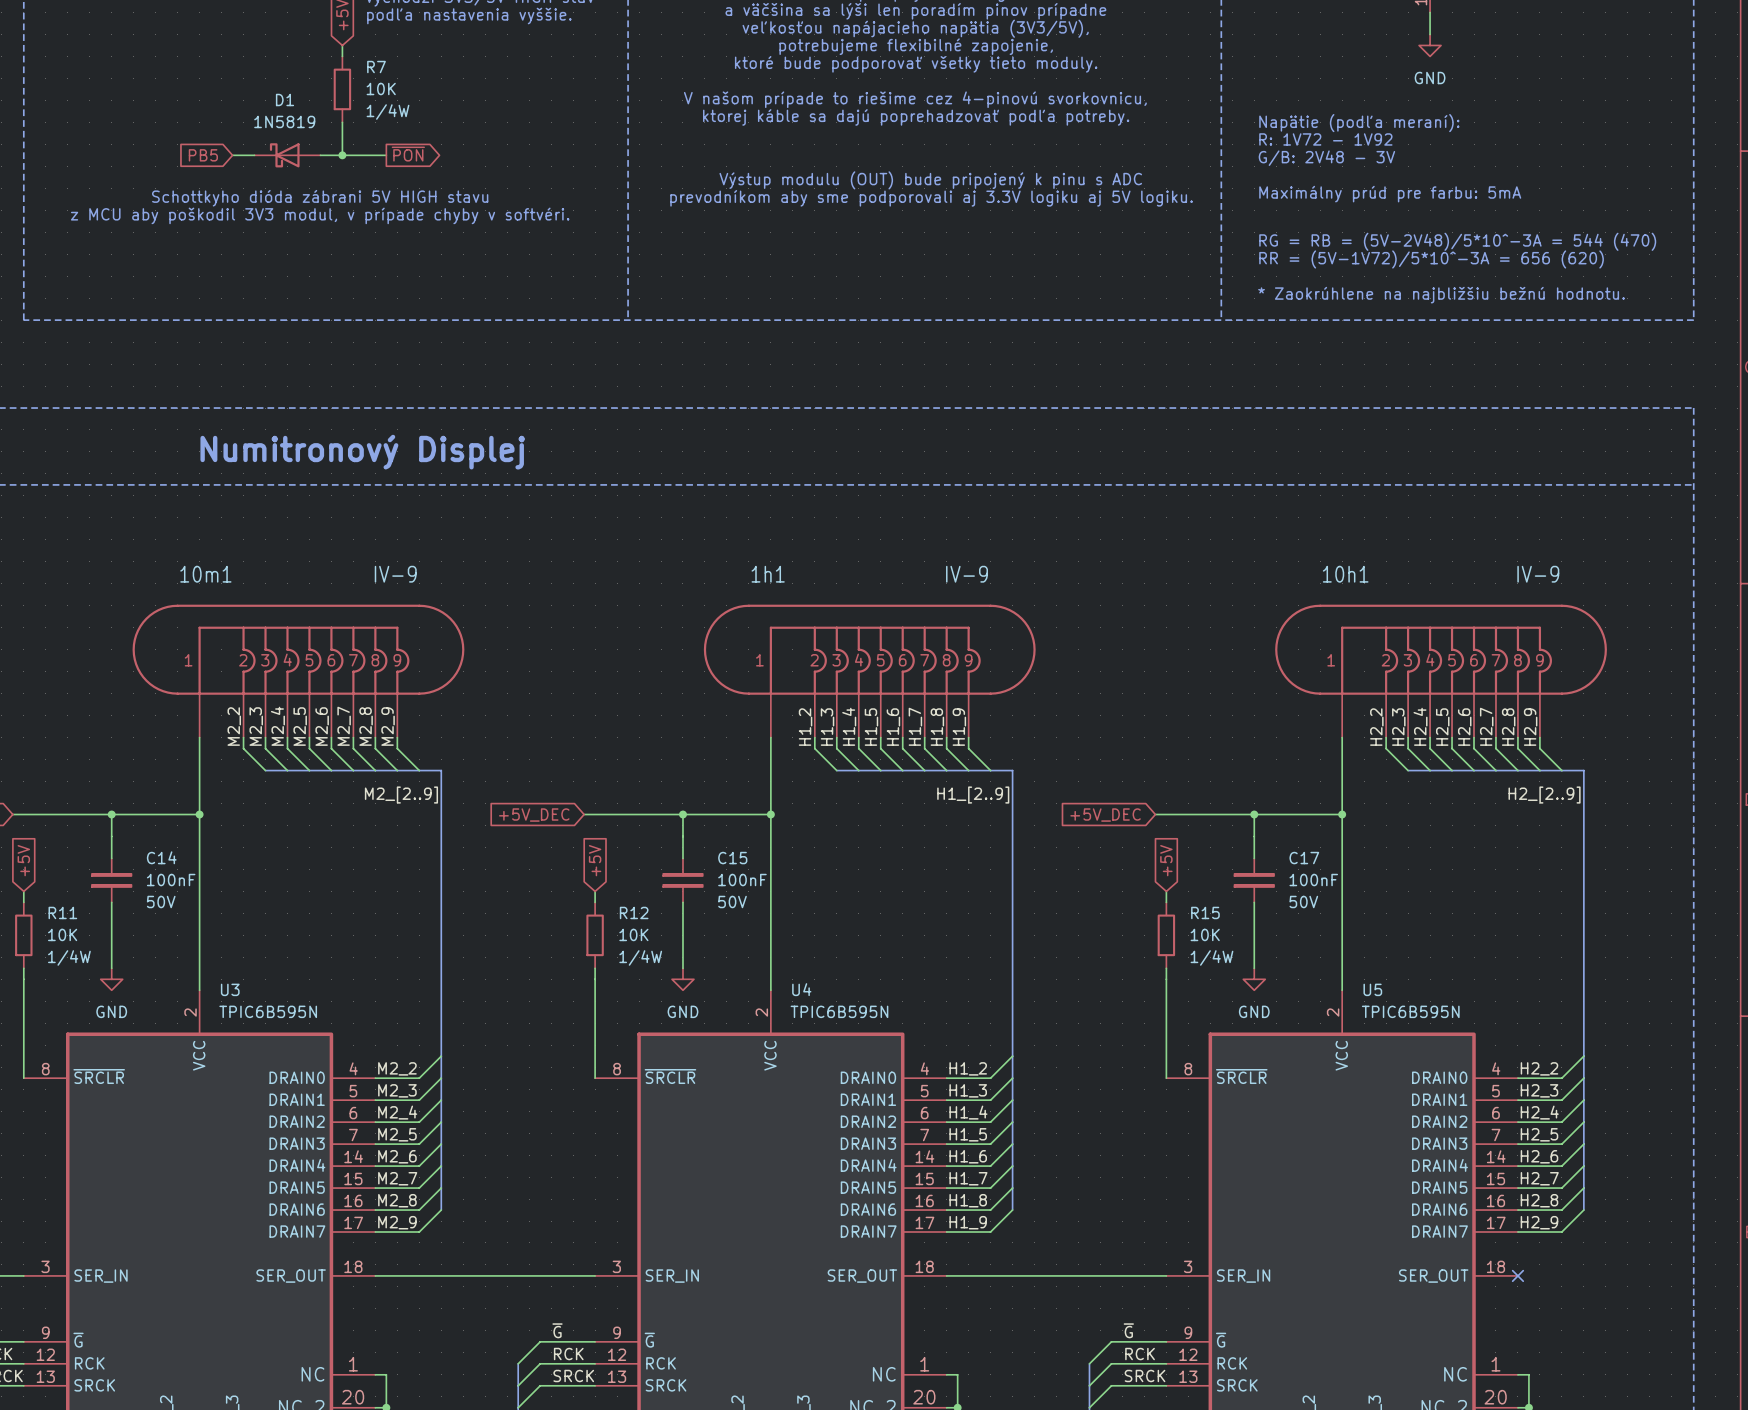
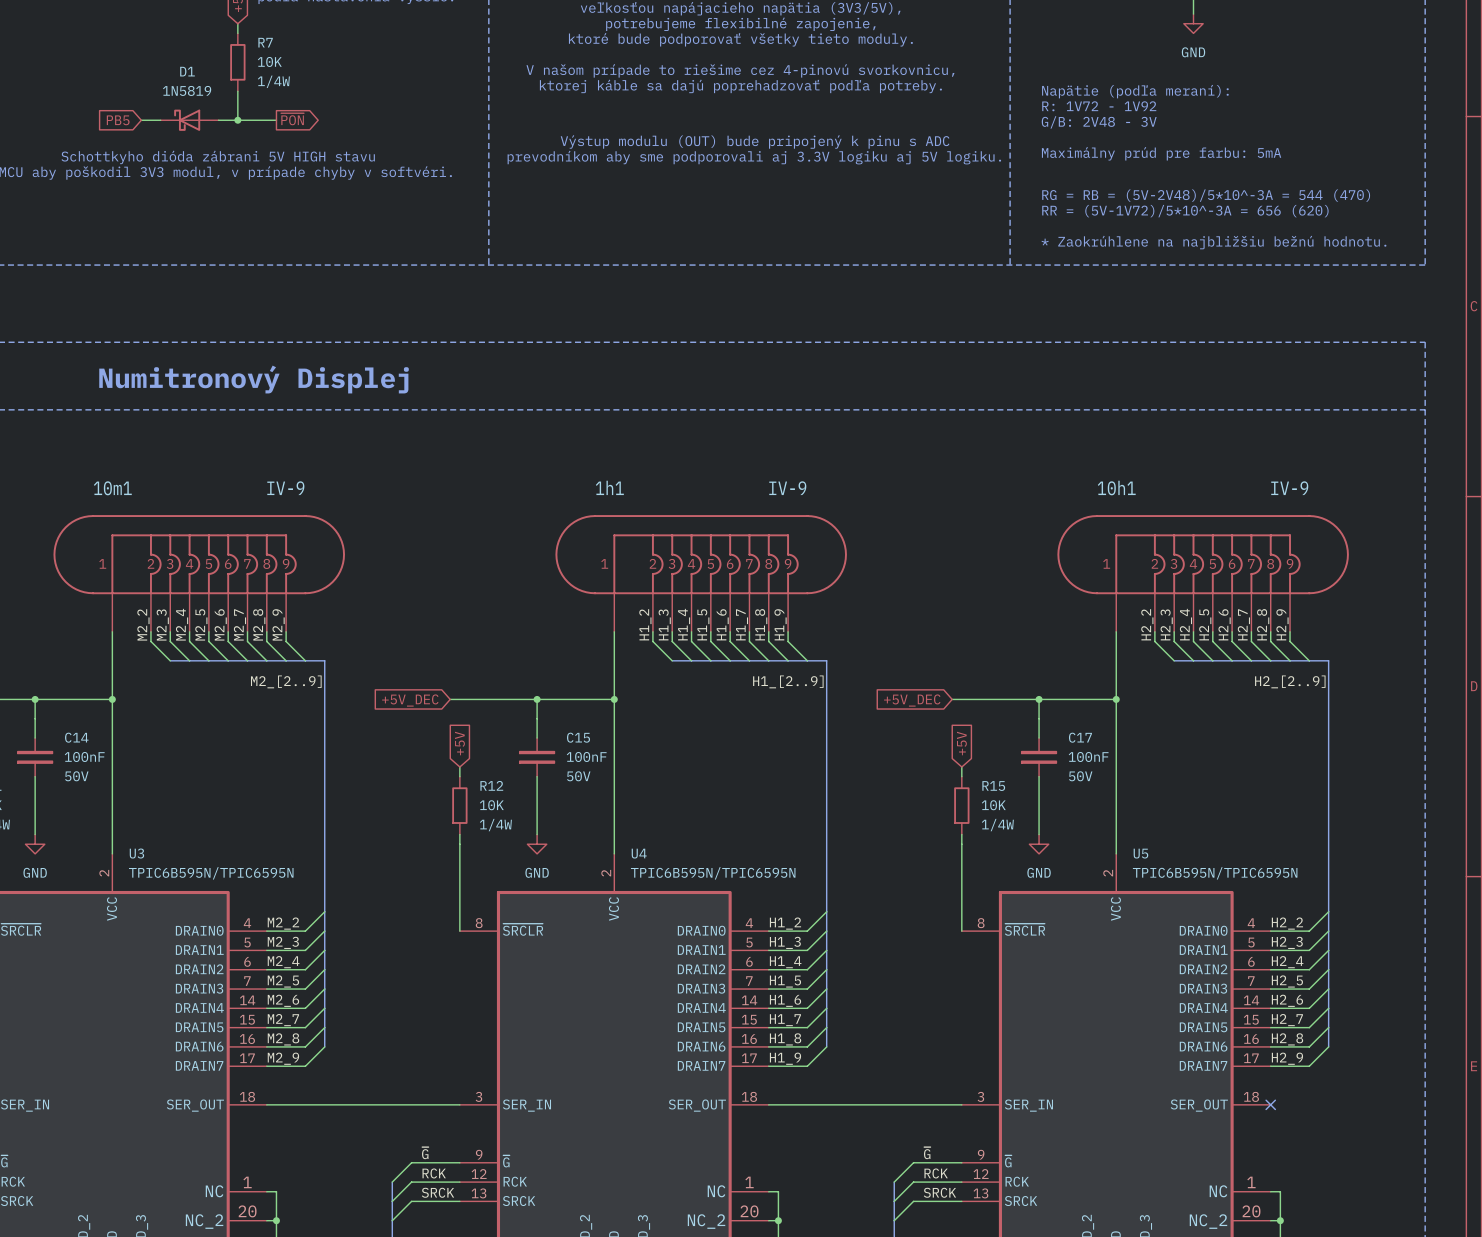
U3 value: TPIC6B595N (268, 1011) -> TPIC6B595N/TPIC6595N (211, 873)
U4 value: TPIC6B595N (839, 1011) -> TPIC6B595N/TPIC6595N (713, 873)
U5 value: TPIC6B595N (1410, 1011) -> TPIC6B595N/TPIC6595N (1215, 873)

